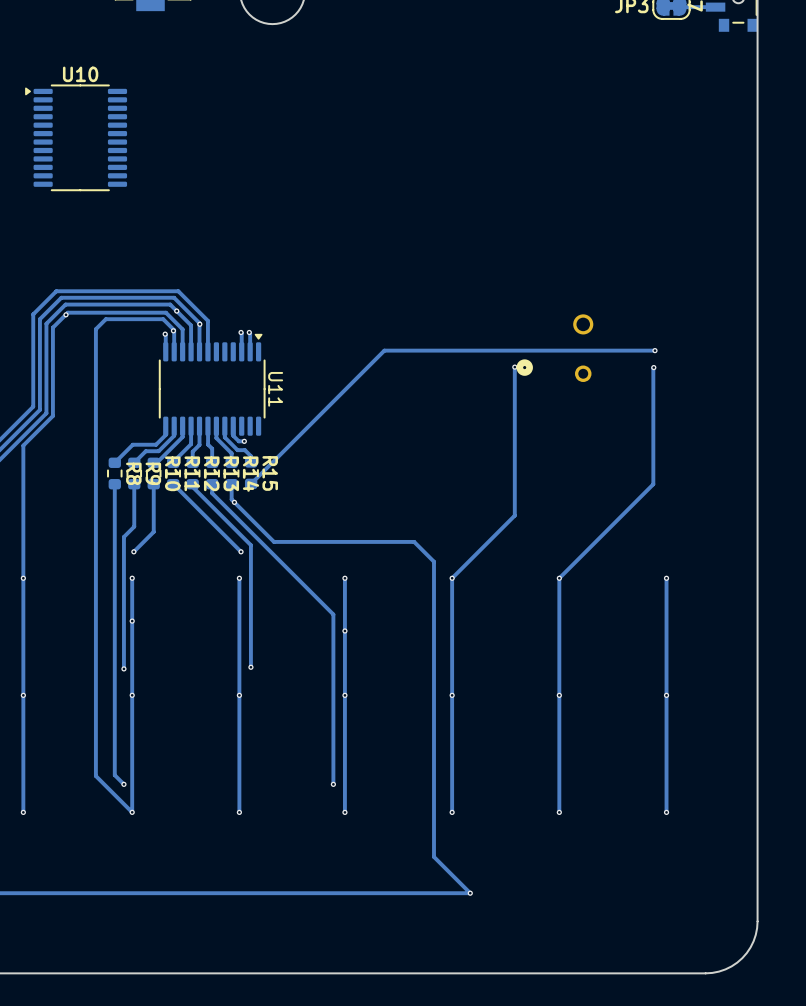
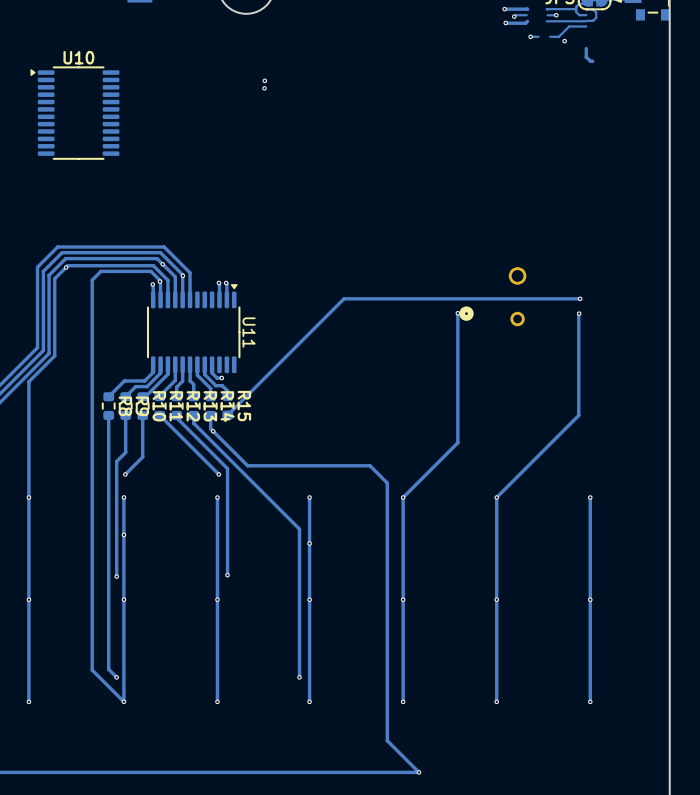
track: none -> (586, 3) (579, 3) (576, 6) (576, 12) (579, 15) (586, 15)
via: none -> (504, 9)
track: none -> (527, 9) (504, 9)
track: none -> (575, 9) (547, 9)
track: none -> (586, 9) (593, 9) (596, 12) (596, 17) (593, 20) (586, 20)
track: none -> (526, 15) (514, 16)
track: none -> (556, 15) (547, 15)
via: none -> (556, 15)
via: none -> (514, 16)
track: none -> (527, 21) (525, 23) (505, 22)
track: none -> (585, 21) (546, 21)
via: none -> (505, 22)
track: none -> (586, 26) (569, 26) (558, 36) (550, 36)
via: none -> (530, 36)
track: none -> (538, 36) (530, 36)
via: none -> (564, 41)
track: none -> (586, 48) (586, 57) (592, 61)
via: none -> (264, 80)
via: none -> (264, 88)

